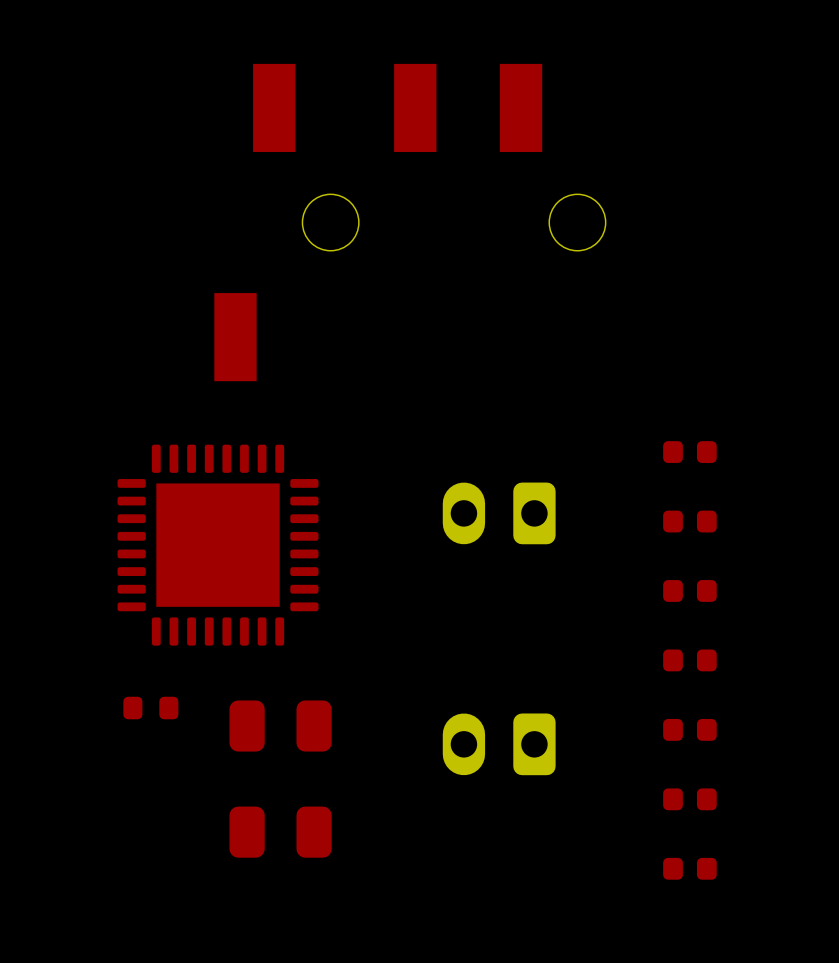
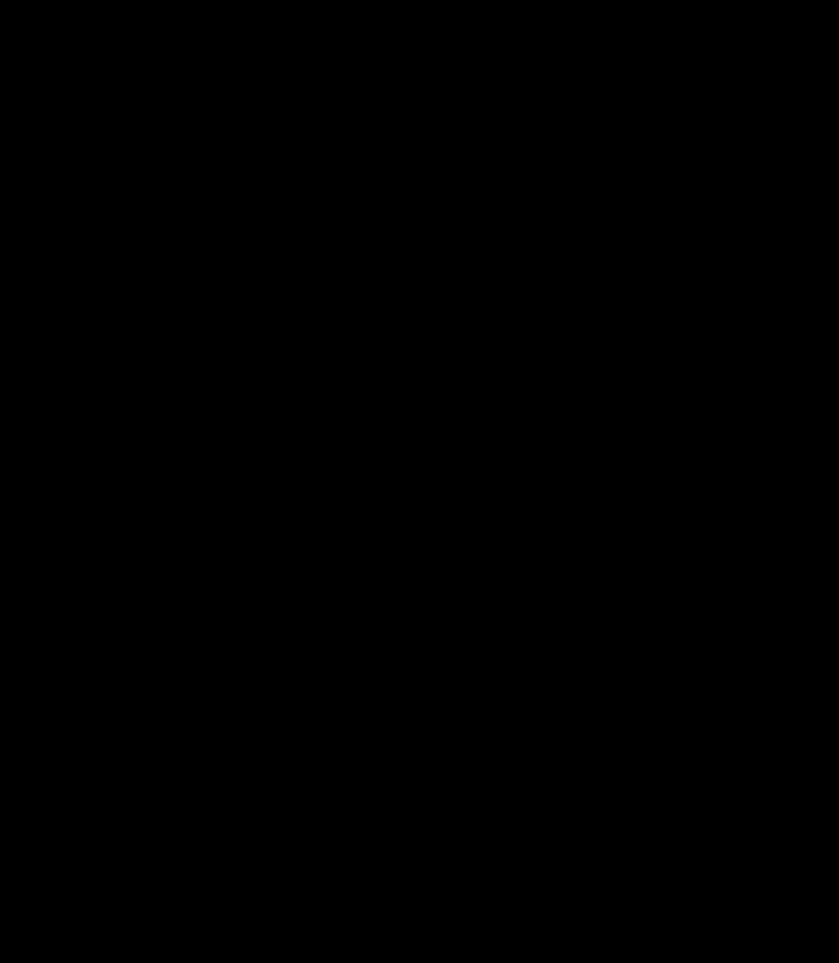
part: (409, 222) -> none
part: (689, 452) -> none
part: (499, 513) -> none
part: (689, 521) -> none
part: (218, 545) -> none
part: (689, 590) -> none
part: (689, 660) -> none
part: (150, 708) -> none
part: (280, 726) -> none
part: (689, 729) -> none
part: (499, 744) -> none
part: (689, 799) -> none
part: (280, 832) -> none
part: (689, 868) -> none

